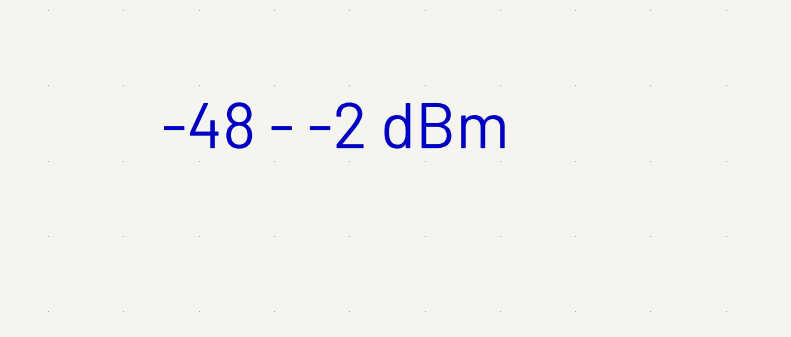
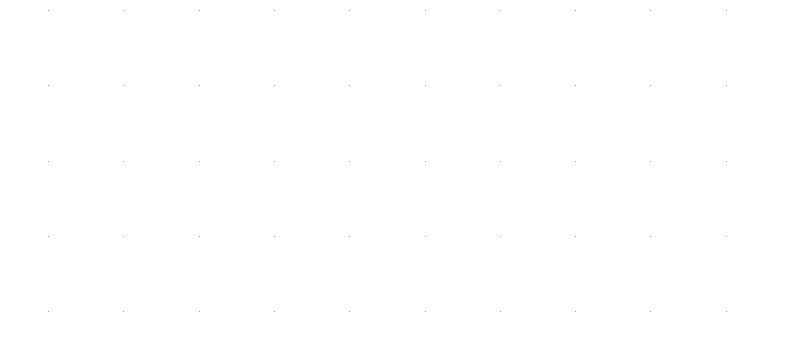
text: -48 - -2 dBm (334, 125) -> none

